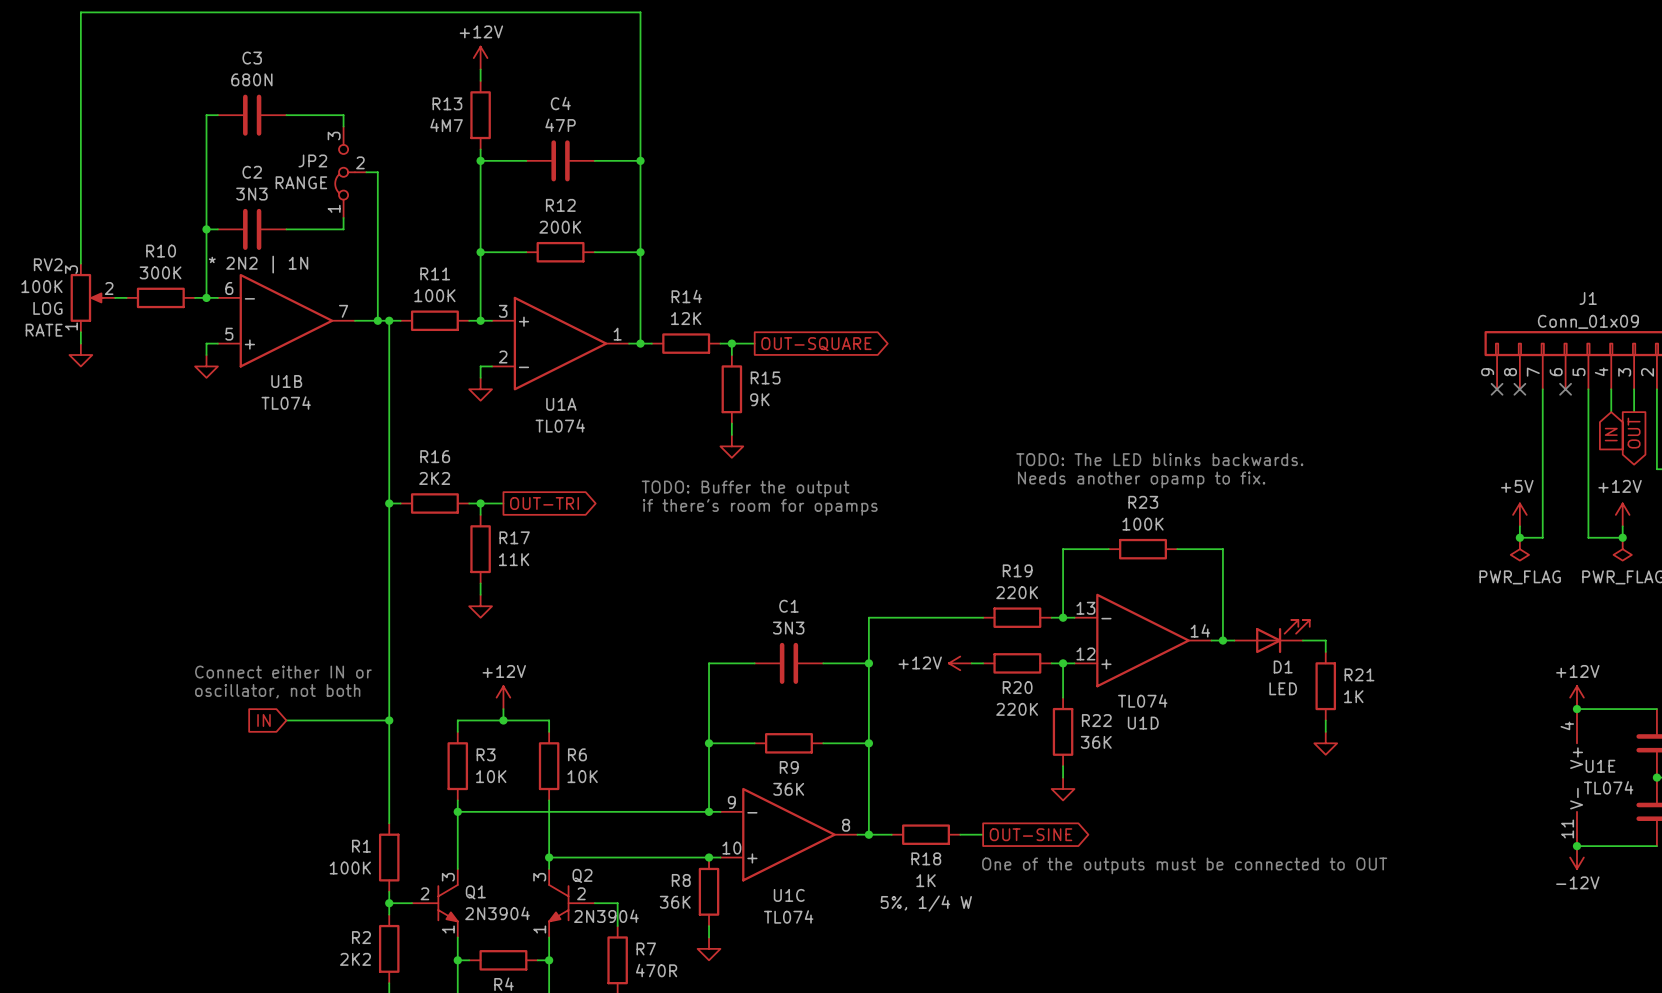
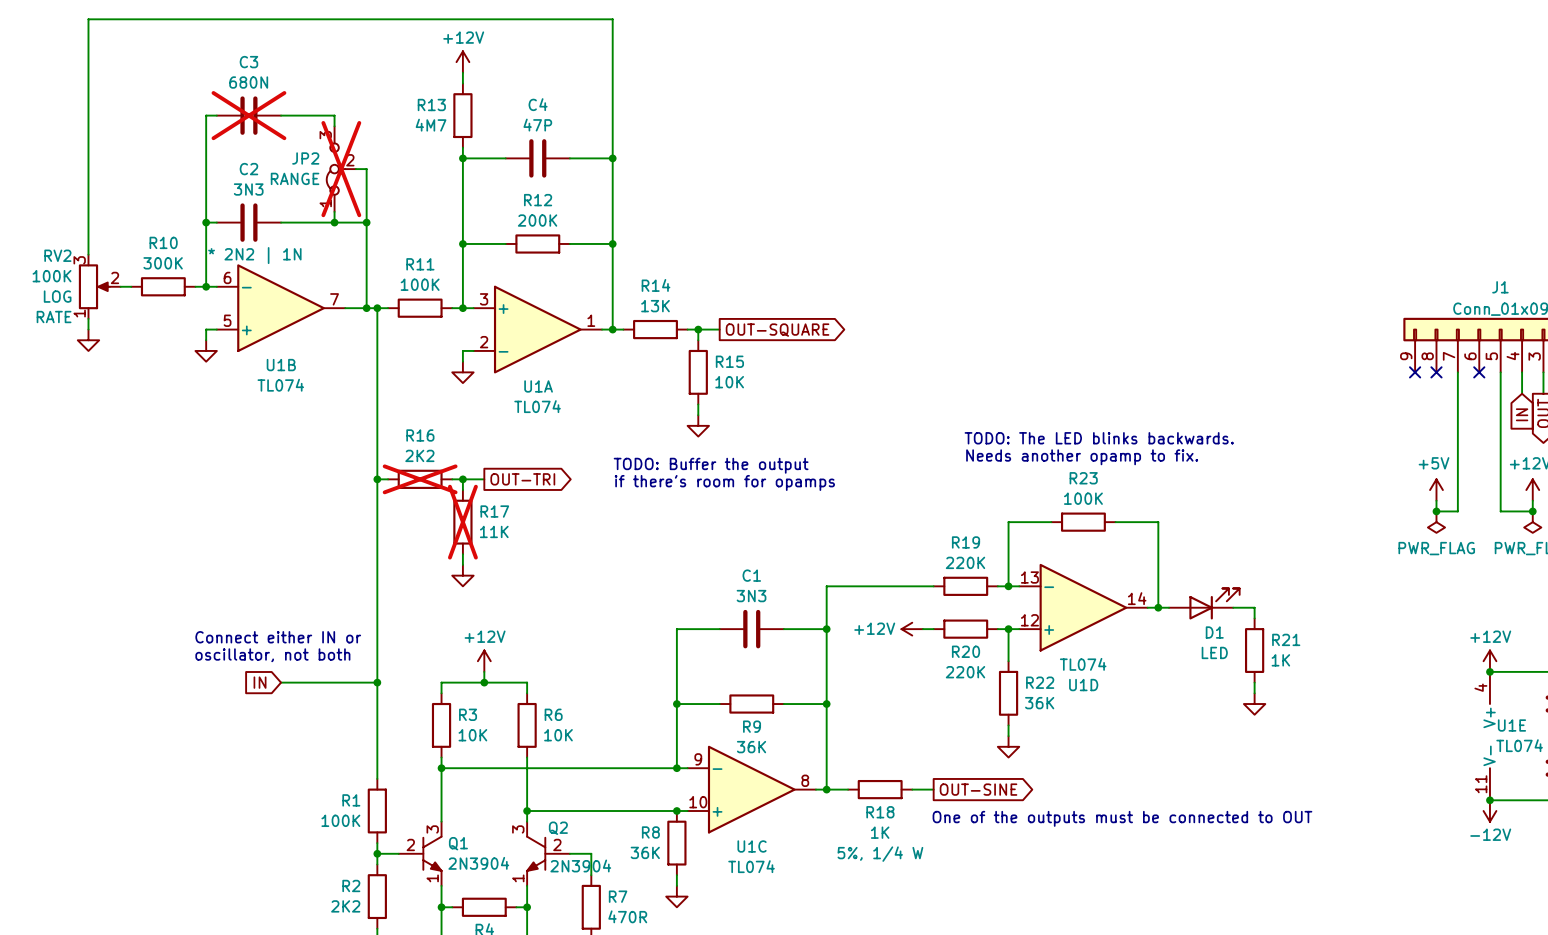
C3 do-not-place cross: none -> (248, 115)
JP2 do-not-place cross: none -> (341, 169)
wire: none -> (334, 222) (366, 222)
junction: none -> (334, 222)
junction: none -> (366, 222)
R14 value: 12K (686, 318) -> 13K (655, 306)
R15 value: 9K (759, 399) -> 10K (729, 382)
R16 do-not-place cross: none -> (420, 479)
R17 do-not-place cross: none -> (462, 522)

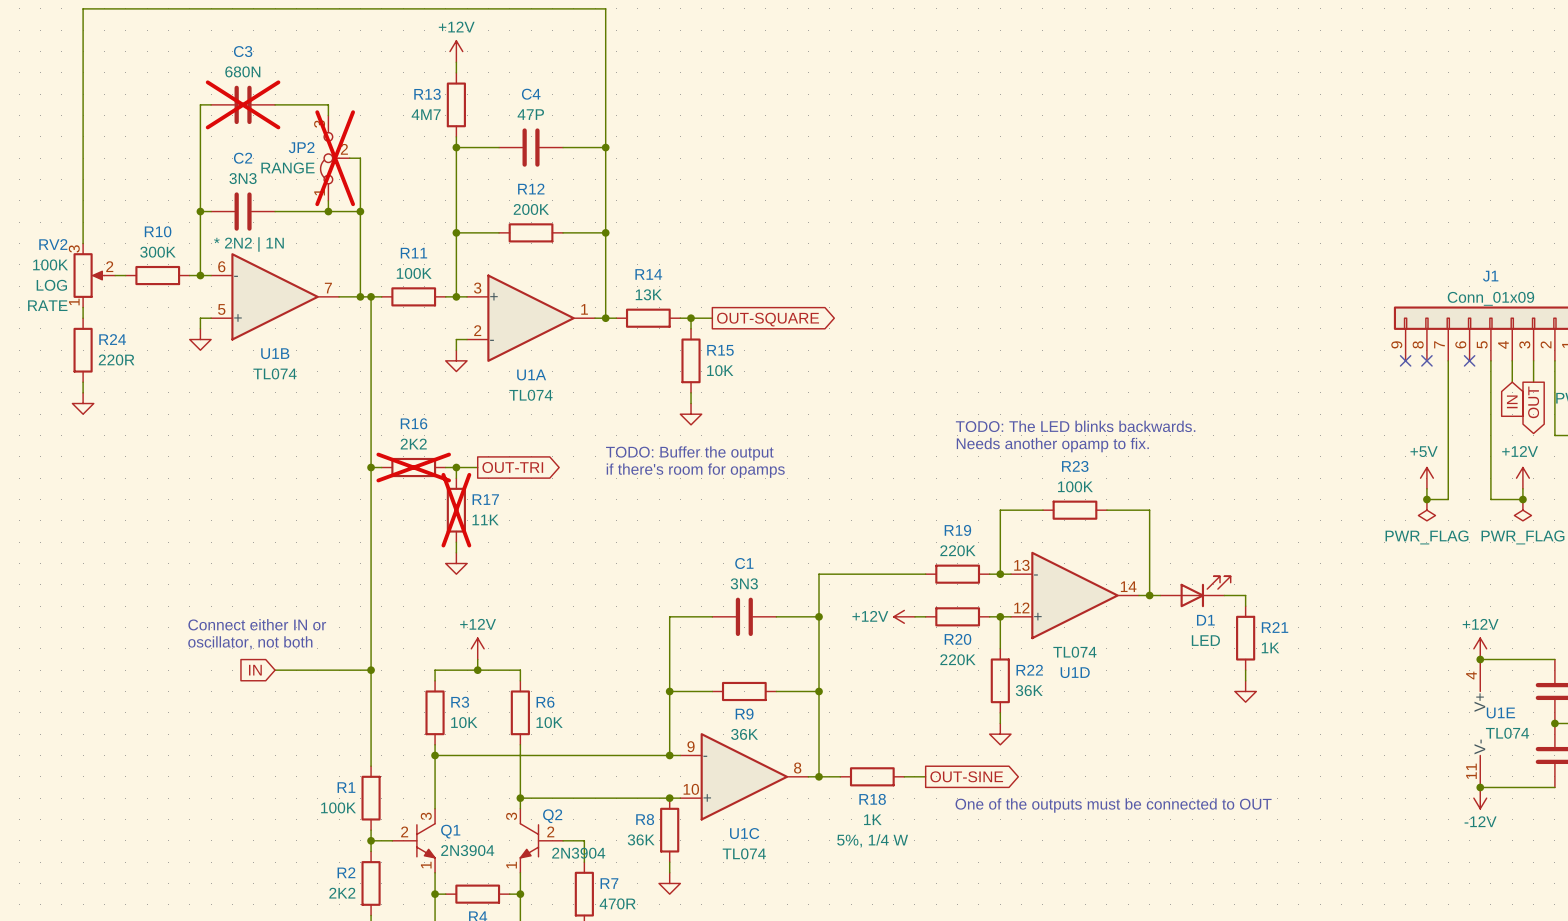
power symbol position: (88, 340) -> (83, 403)
R24: none -> 220R (83, 350)
wire: none -> (83, 382) (83, 392)

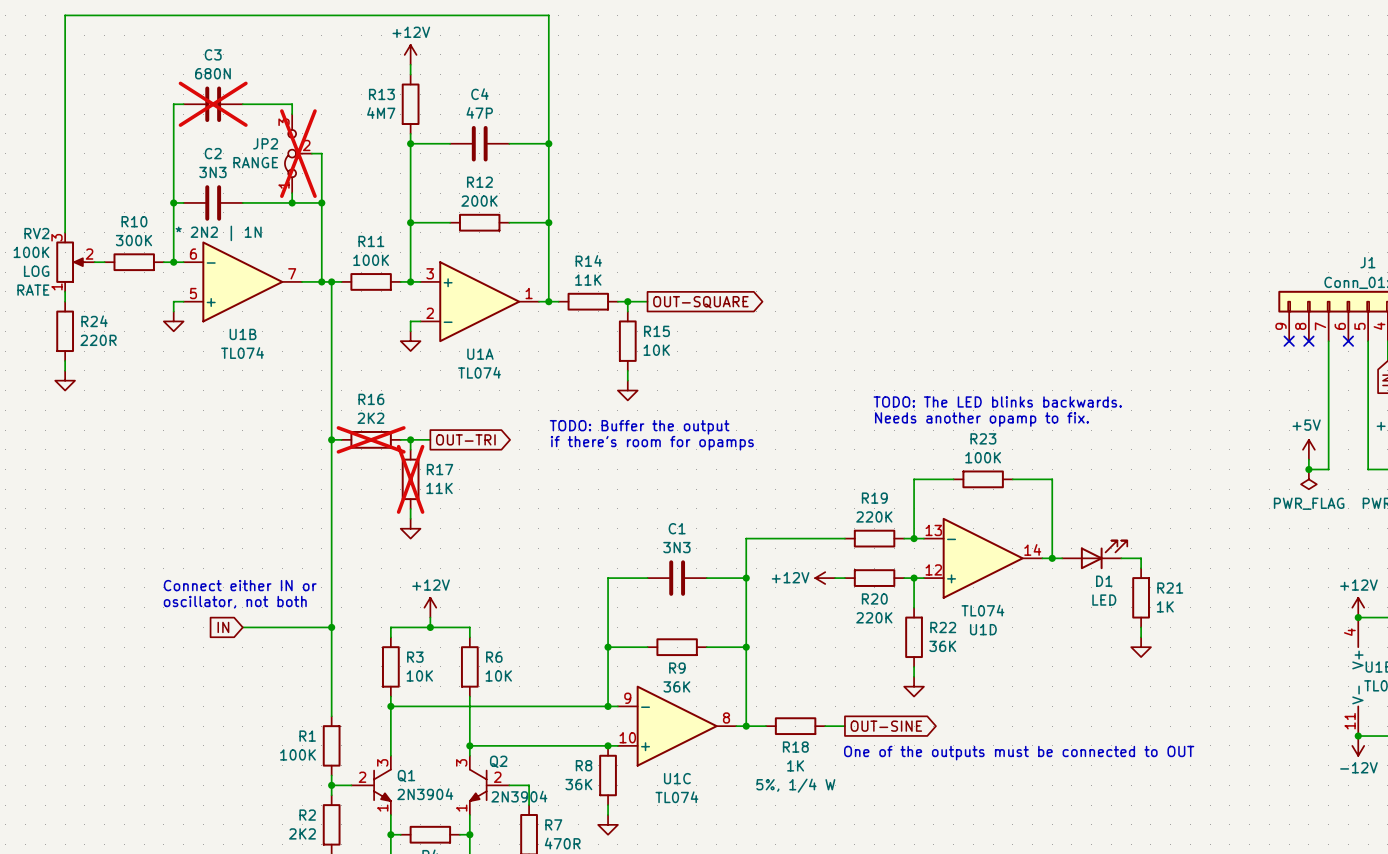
R14 value: 13K (648, 294) -> 11K (588, 280)

